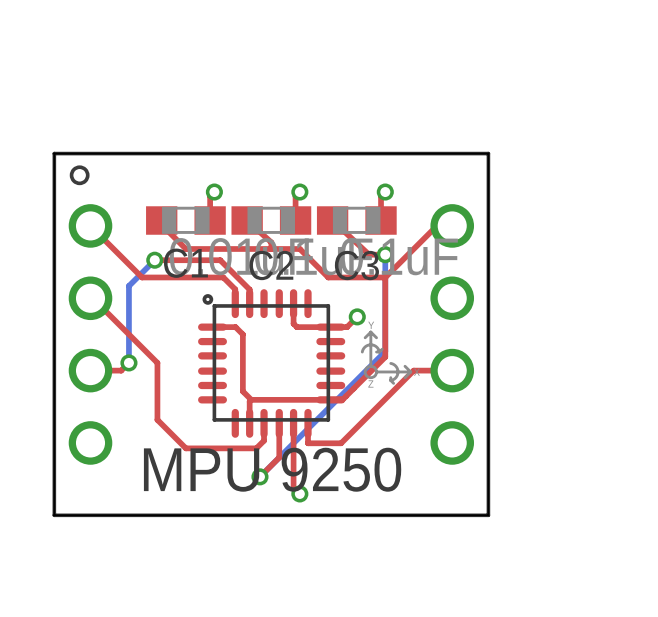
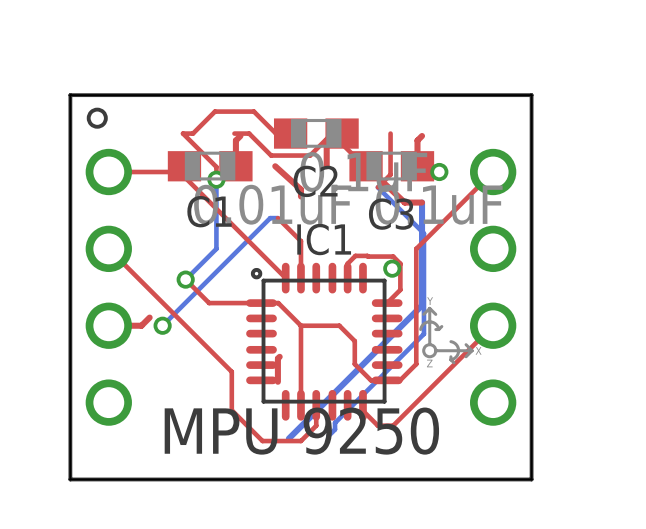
top track: none -> (234, 133) (249, 133) (271, 155) (310, 155) (332, 133) (342, 133) (342, 143) (362, 164)
top track: none -> (290, 133) (275, 133) (253, 111) (214, 111) (193, 133) (183, 133) (216, 166) (216, 179)
top track: none -> (390, 133) (390, 174) (377, 187)
via: (214, 192) -> none
via: (299, 192) -> none
via: (385, 192) -> none
top track: (161, 220) (161, 224) (185, 248) (299, 248) (328, 277) (385, 277) -> none
C2 position: (271, 220) -> (316, 133)
top track: (90, 225) (142, 277) (223, 277) (235, 289) (235, 303) -> (108, 172) (179, 172) (285, 278)
via: none -> (439, 172)
top track: (452, 225) (436, 225) (385, 277) -> (493, 172) (416, 248) (416, 364) (400, 380) (370, 380) (354, 364) (354, 341) (339, 325) (300, 325)
bottom track: none -> (216, 179) (216, 248) (185, 279)
via: none -> (216, 179)
bottom track: none -> (377, 187) (423, 233) (423, 333) (335, 422) (335, 429) (328, 436)
via: (385, 254) -> none
top track: (154, 260) (220, 260) (249, 289) (249, 303) -> none
bottom track: (154, 260) (128, 286) (128, 362) -> none
via: (154, 260) -> none
top track: none -> (277, 218) (300, 241) (300, 278)
bottom track: none -> (277, 218) (270, 218) (162, 325)
top track: (385, 277) (385, 357) (342, 399) (251, 399) (242, 391) (242, 334) (235, 327) (212, 327) -> none
top track: (90, 298) (92, 298) (157, 362) (157, 419) (185, 448) (256, 448) (264, 440) (264, 423) -> (108, 248) (231, 371) (231, 410) (262, 441) (300, 441) (316, 425) (316, 405)
top track: (293, 303) (293, 323) (296, 327) (347, 327) (357, 316) -> none
top track: none -> (347, 278) (347, 263) (355, 255) (393, 256) (400, 263) (400, 289) (387, 303)
top track: none -> (185, 279) (209, 303) (278, 303) (300, 325)
via: none -> (185, 279)
via position: (128, 362) -> (162, 325)
part: (305, 363) -> none
top track: none -> (300, 325) (300, 405)
top track: (452, 370) (413, 370) (341, 443) (308, 443) (308, 423) -> (493, 325) (393, 425) (377, 425) (362, 410) (362, 405)
IC1: none -> (359, 341)
top track: (279, 423) (279, 457) (259, 476) -> none
top track: (293, 423) (293, 487) (299, 493) -> none
via: (259, 476) -> none
via: (299, 493) -> none

